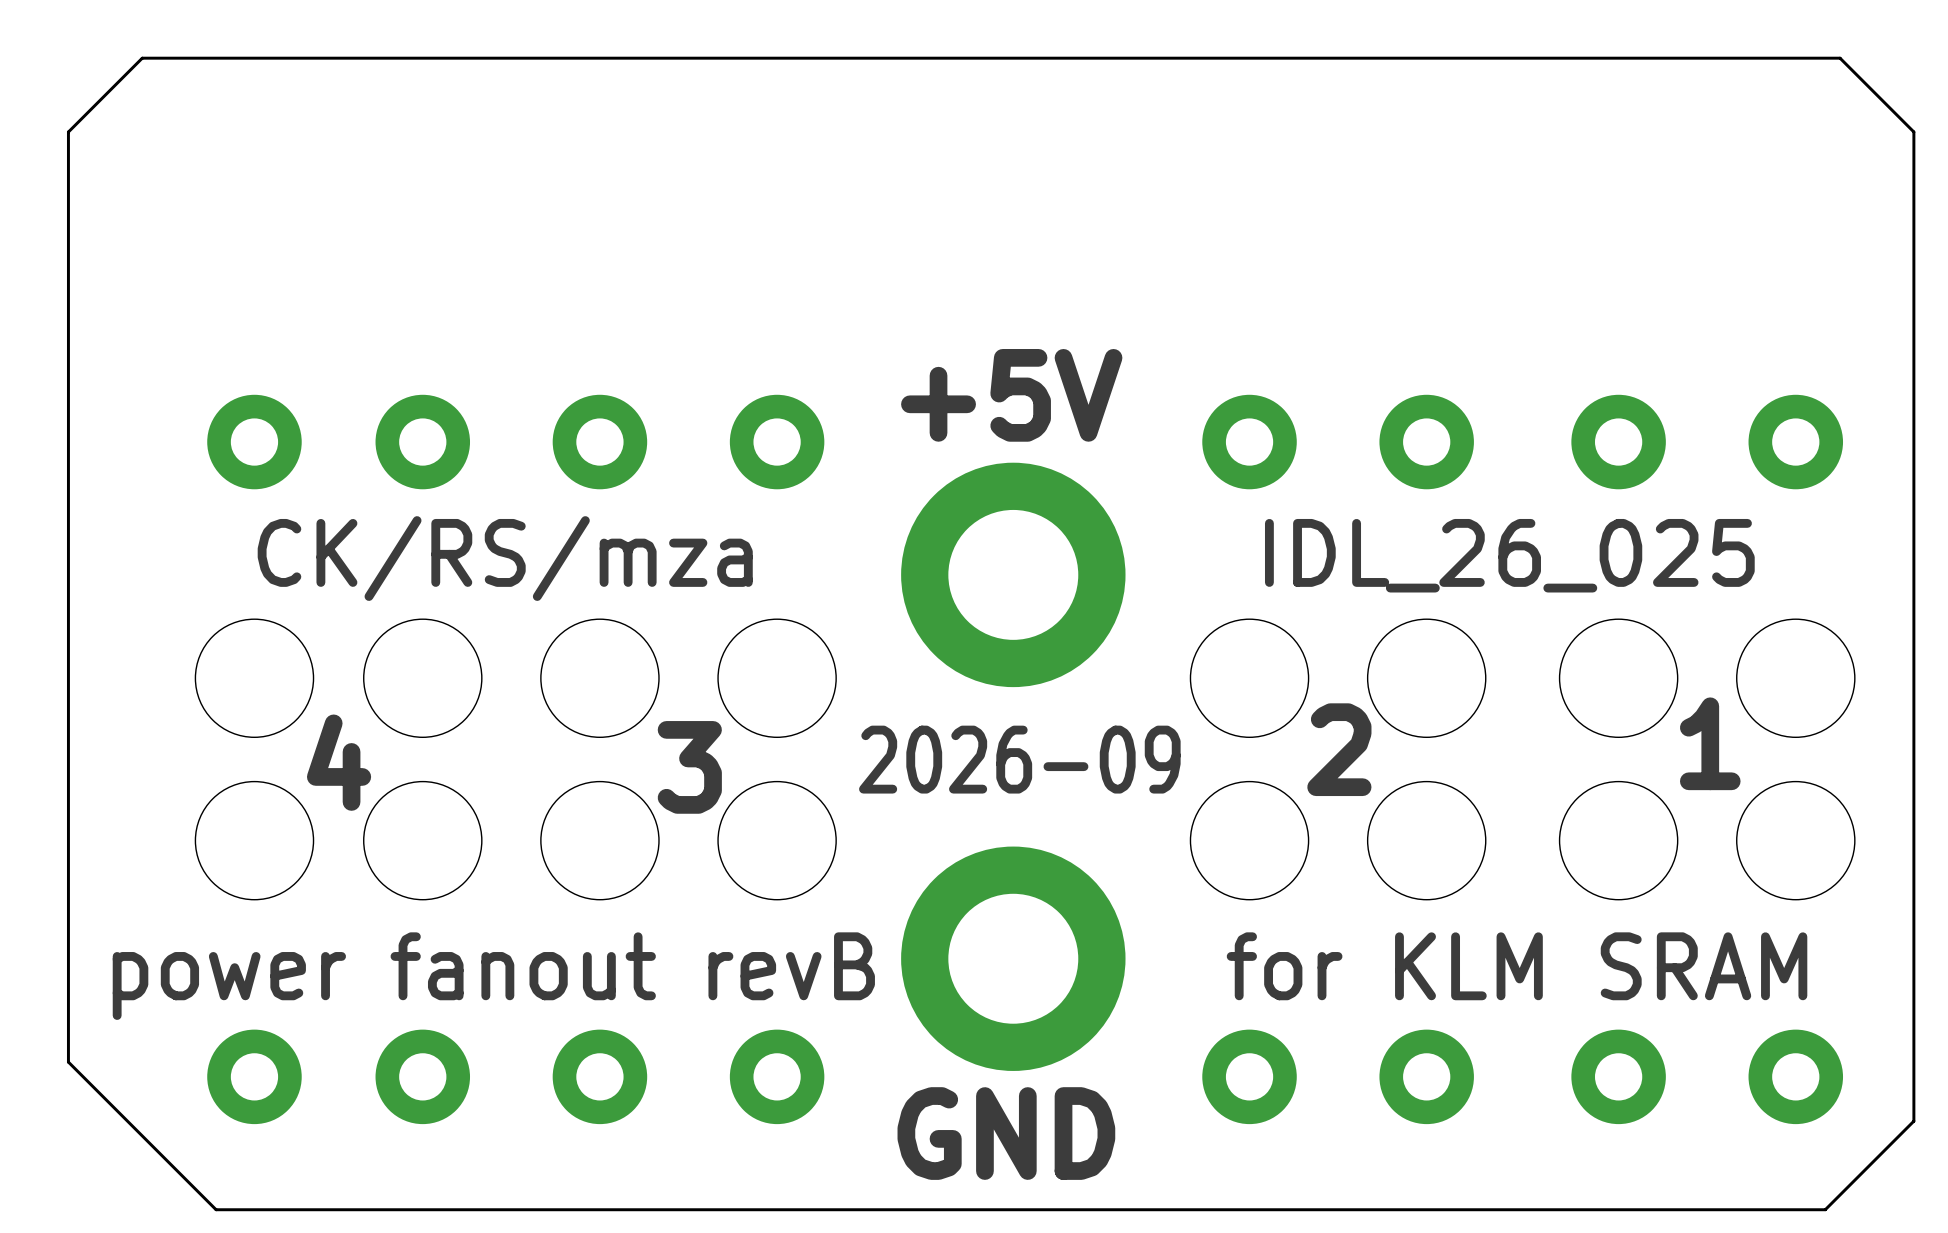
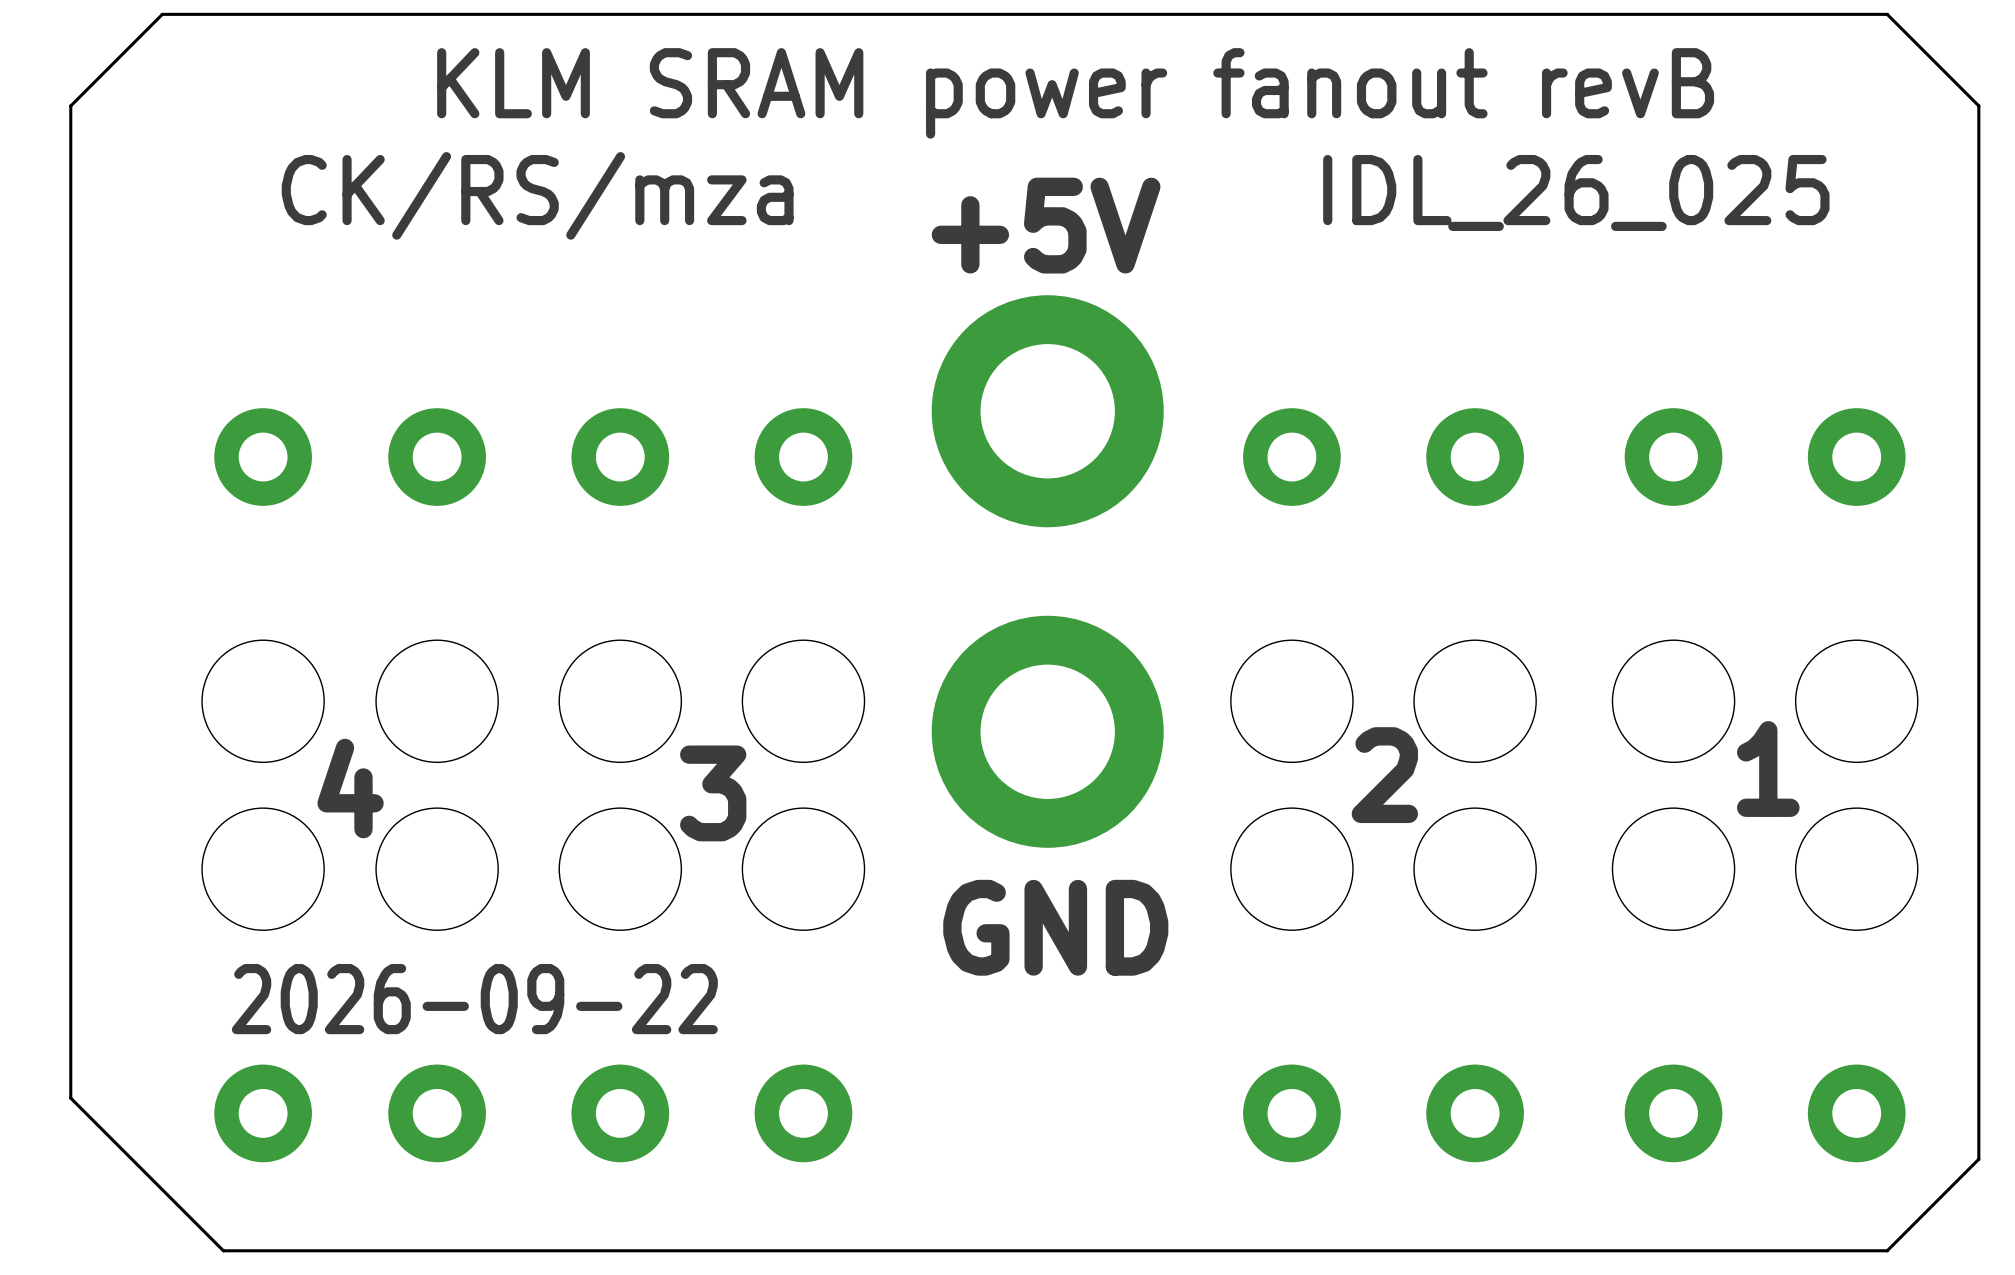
text: none -> KLM SRAM power fanout revB (1075, 93)
board edge: (1913, 132) (1840, 58) (142, 58) (68, 132) -> (1978, 136) (1978, 105) (1887, 14) (162, 14) (70, 105) (70, 136)
text position: +5V (1011, 395) -> +5V (1046, 225)
part: none -> (1047, 411)
text position: IDL_26_025 (1509, 555) -> IDL_26_025 (1576, 192)
text position: CK/RS/mza (505, 558) -> CK/RS/mza (537, 195)
part: (1013, 574) -> none
part: none -> (1047, 731)
text: 2026-09 (1019, 759) -> none
part: (1013, 958) -> none
text: none -> 2026-09-22 (474, 999)
text: for KLM SRAM (1517, 966) -> none
text: power fanout revB (493, 976) -> none
text position: GND (1006, 1133) -> GND (1055, 927)

